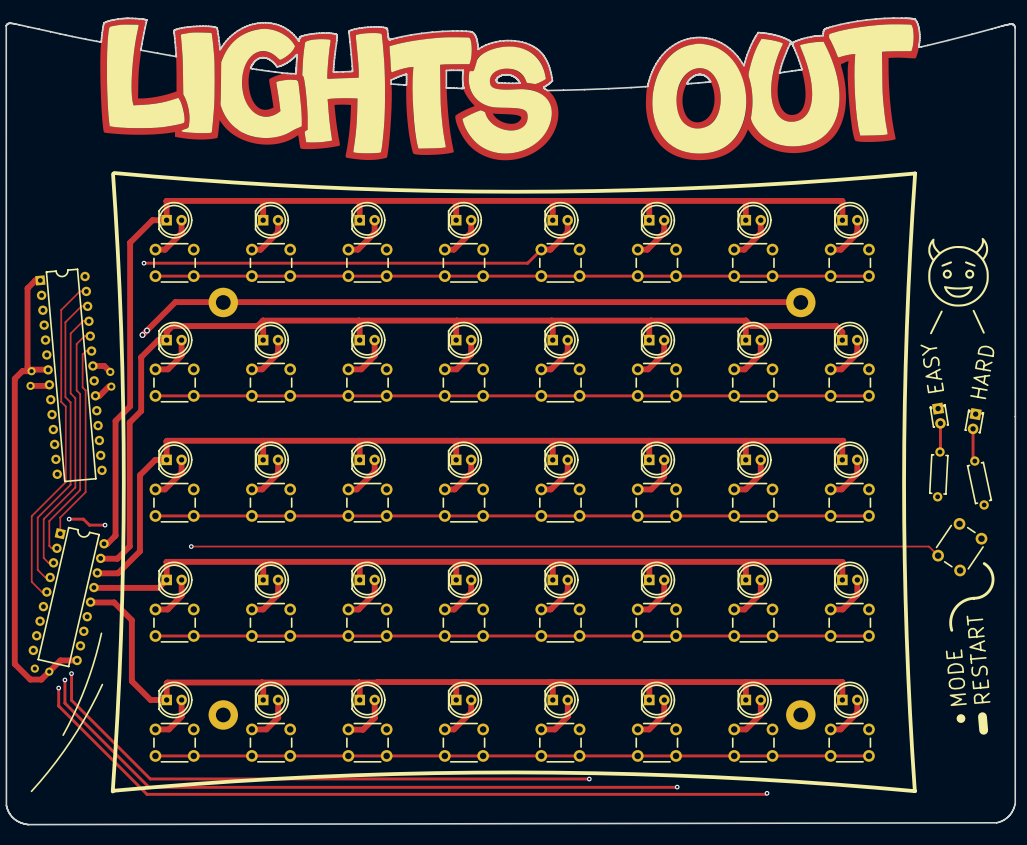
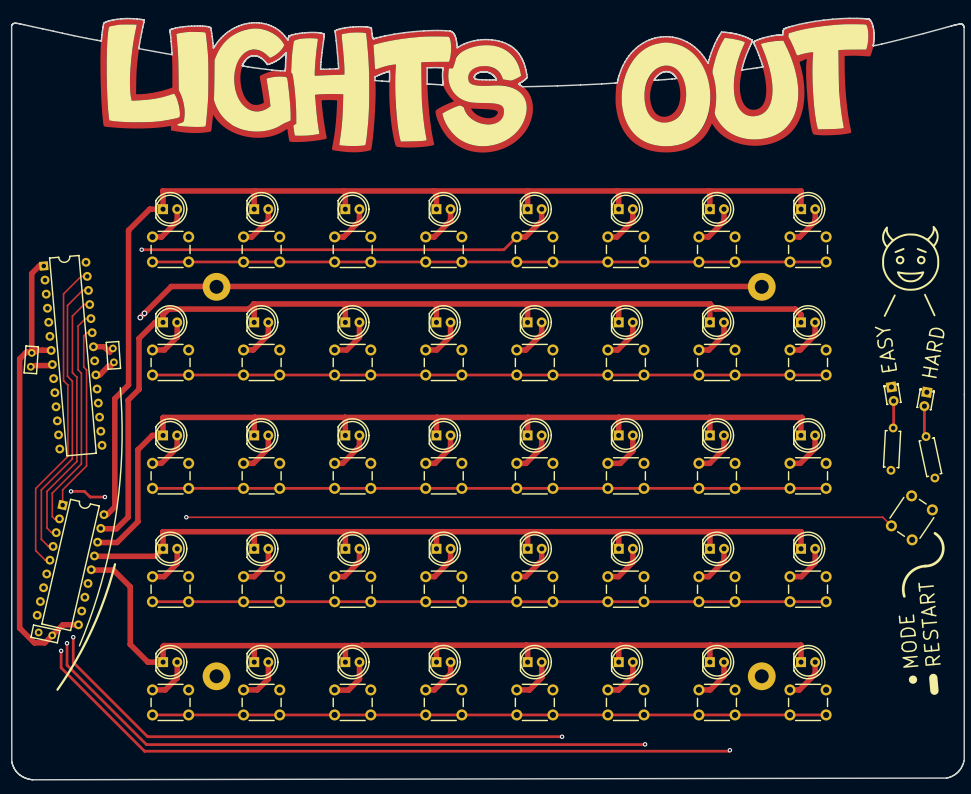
line: (113, 173) (121, 328) (123, 482) (120, 637) (112, 791) -> none
line: (114, 173) (314, 186) (514, 191) (715, 187) (915, 173) (906, 327) (904, 482) (906, 636) (914, 791) -> none
part footprint: [26, 367, 36, 391] -> [23, 345, 39, 375]
part footprint: [106, 367, 116, 391] -> [105, 341, 121, 370]
line: none -> (120, 387) (121, 453) (115, 519) (101, 583) (79, 645)
line: none -> (115, 564) (104, 597) (91, 629) (76, 660) (57, 689)
line: (101, 633) (86, 685) (63, 735) -> none
part footprint: [30, 664, 54, 676] -> [30, 624, 61, 644]
line: (102, 684) (71, 740) (31, 791) -> none
line: (114, 790) (314, 776) (514, 772) (715, 777) (915, 791) -> none

